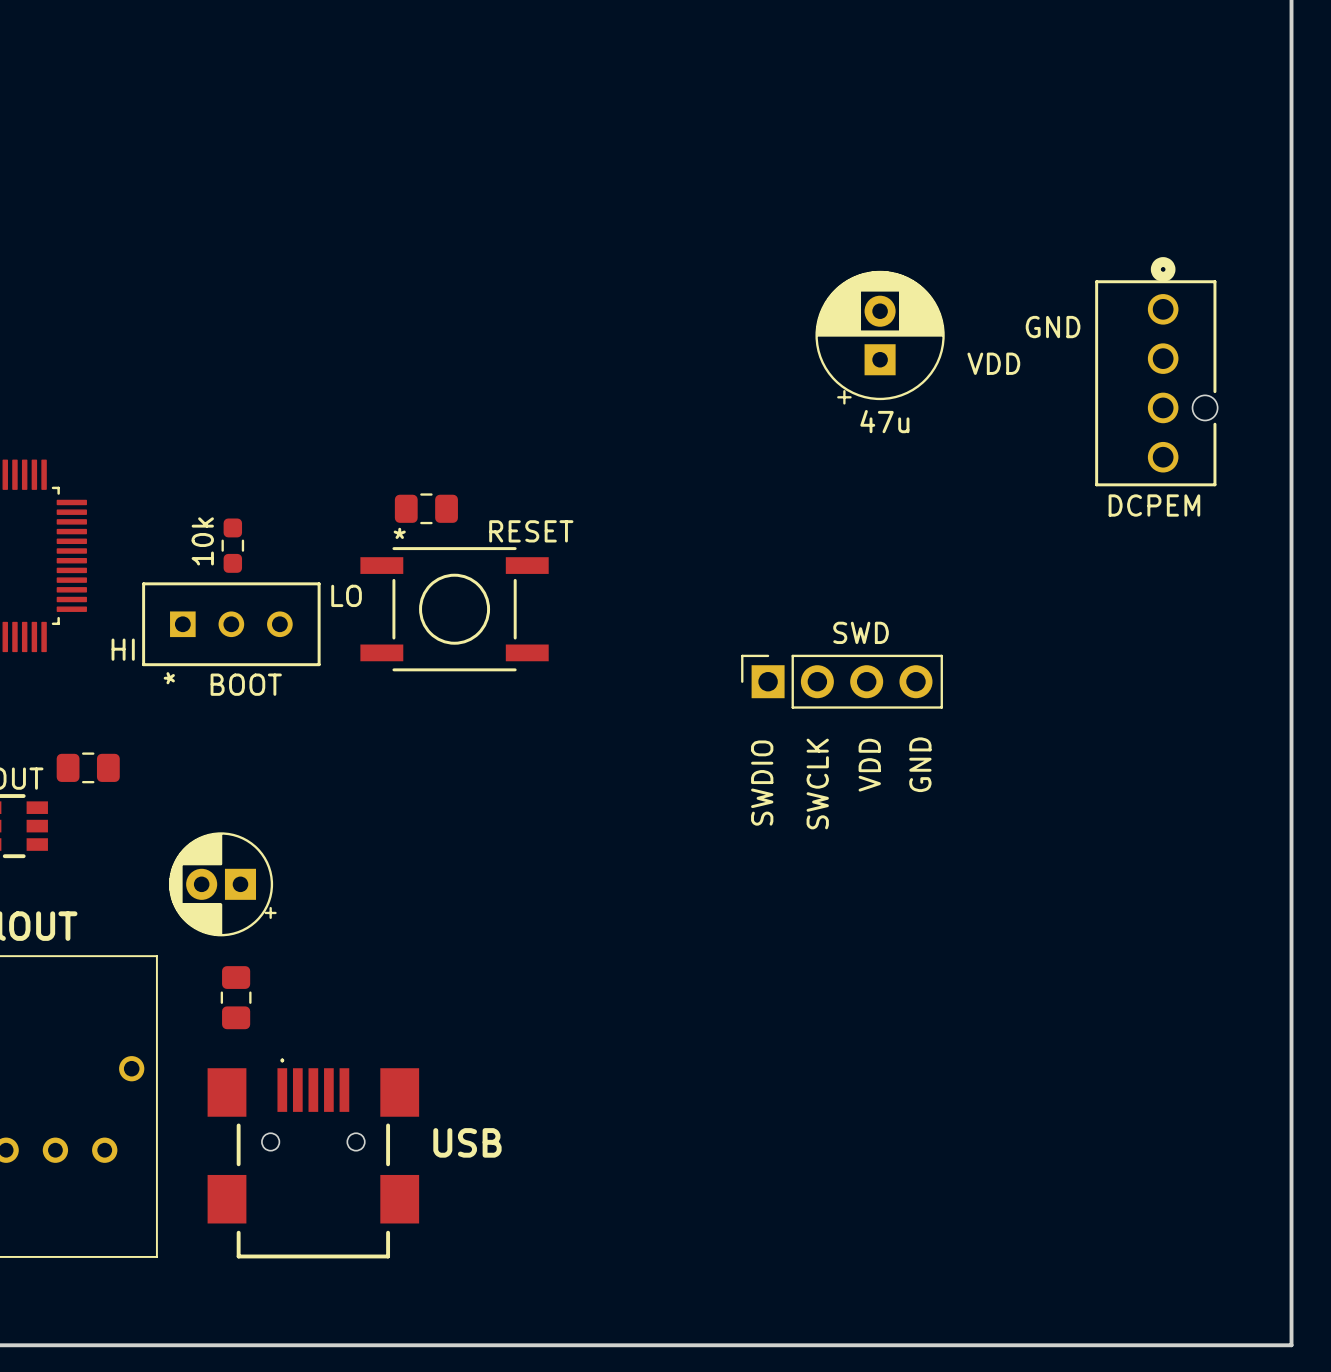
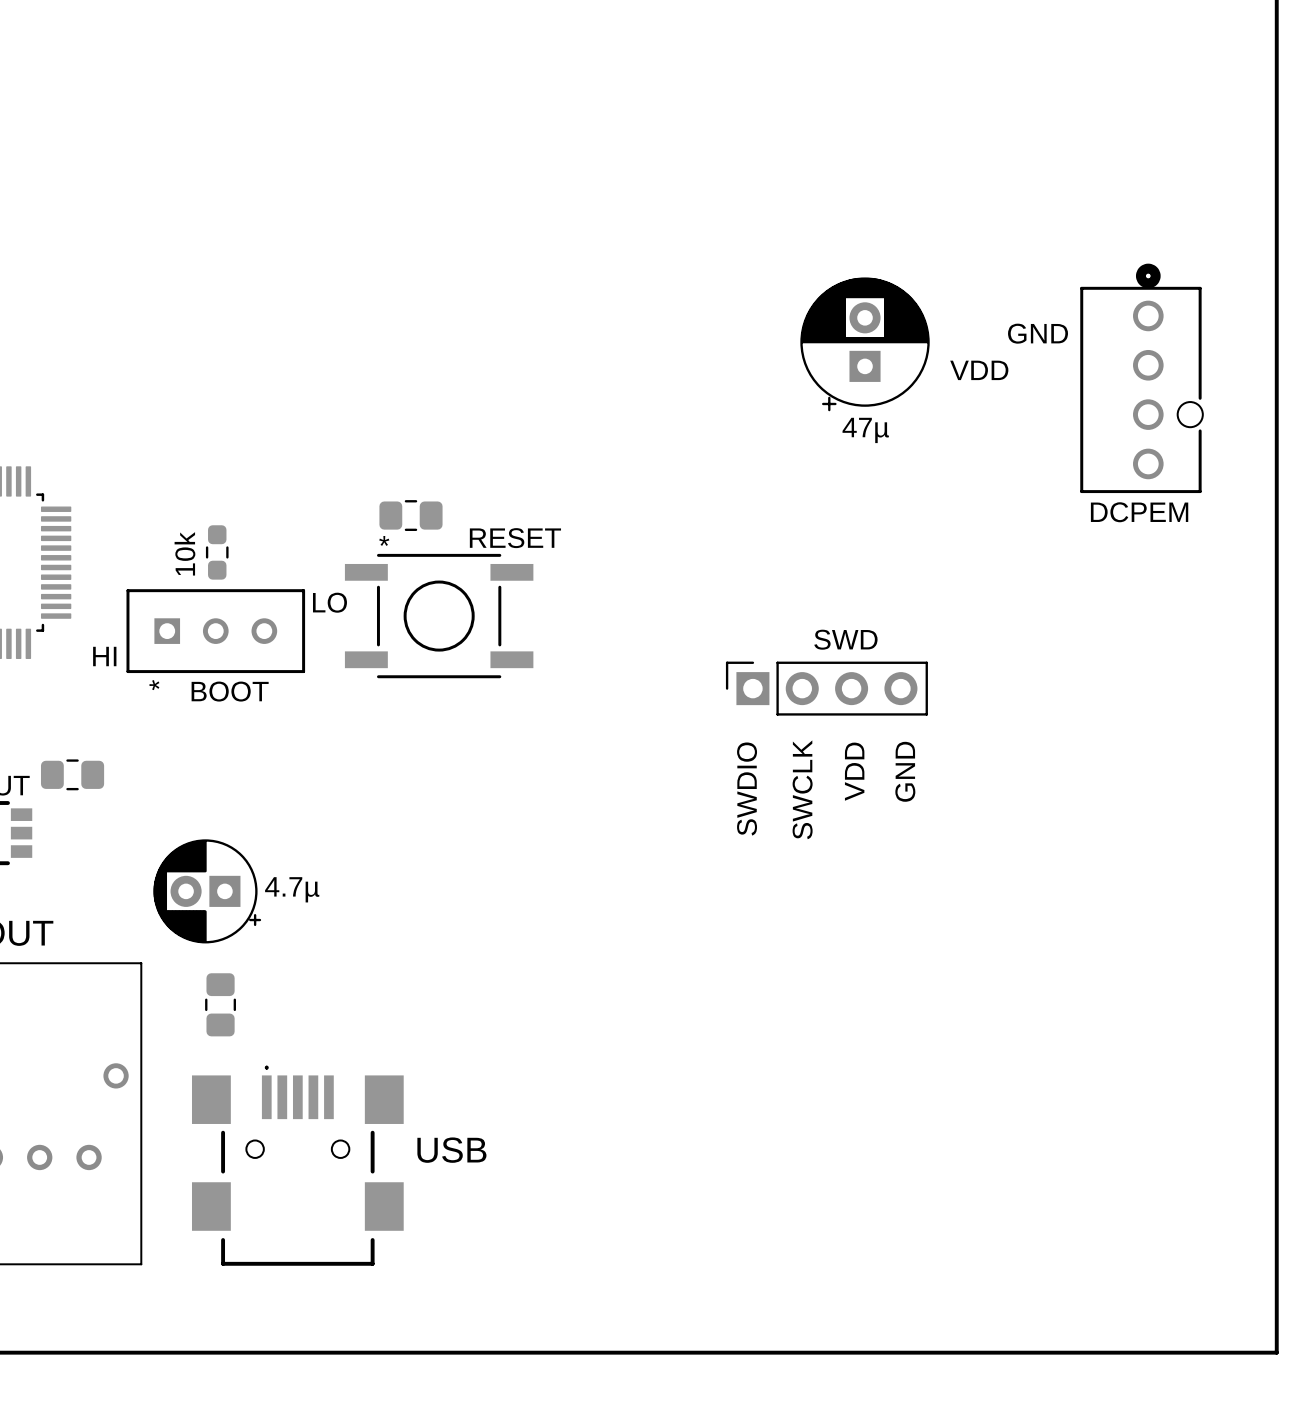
part value: 47u (884, 421) -> none
text: none -> 47µ (865, 430)
part value: 10k (202, 541) -> none
text: none -> 10k (184, 553)
text: none -> 4.7µ (292, 889)

